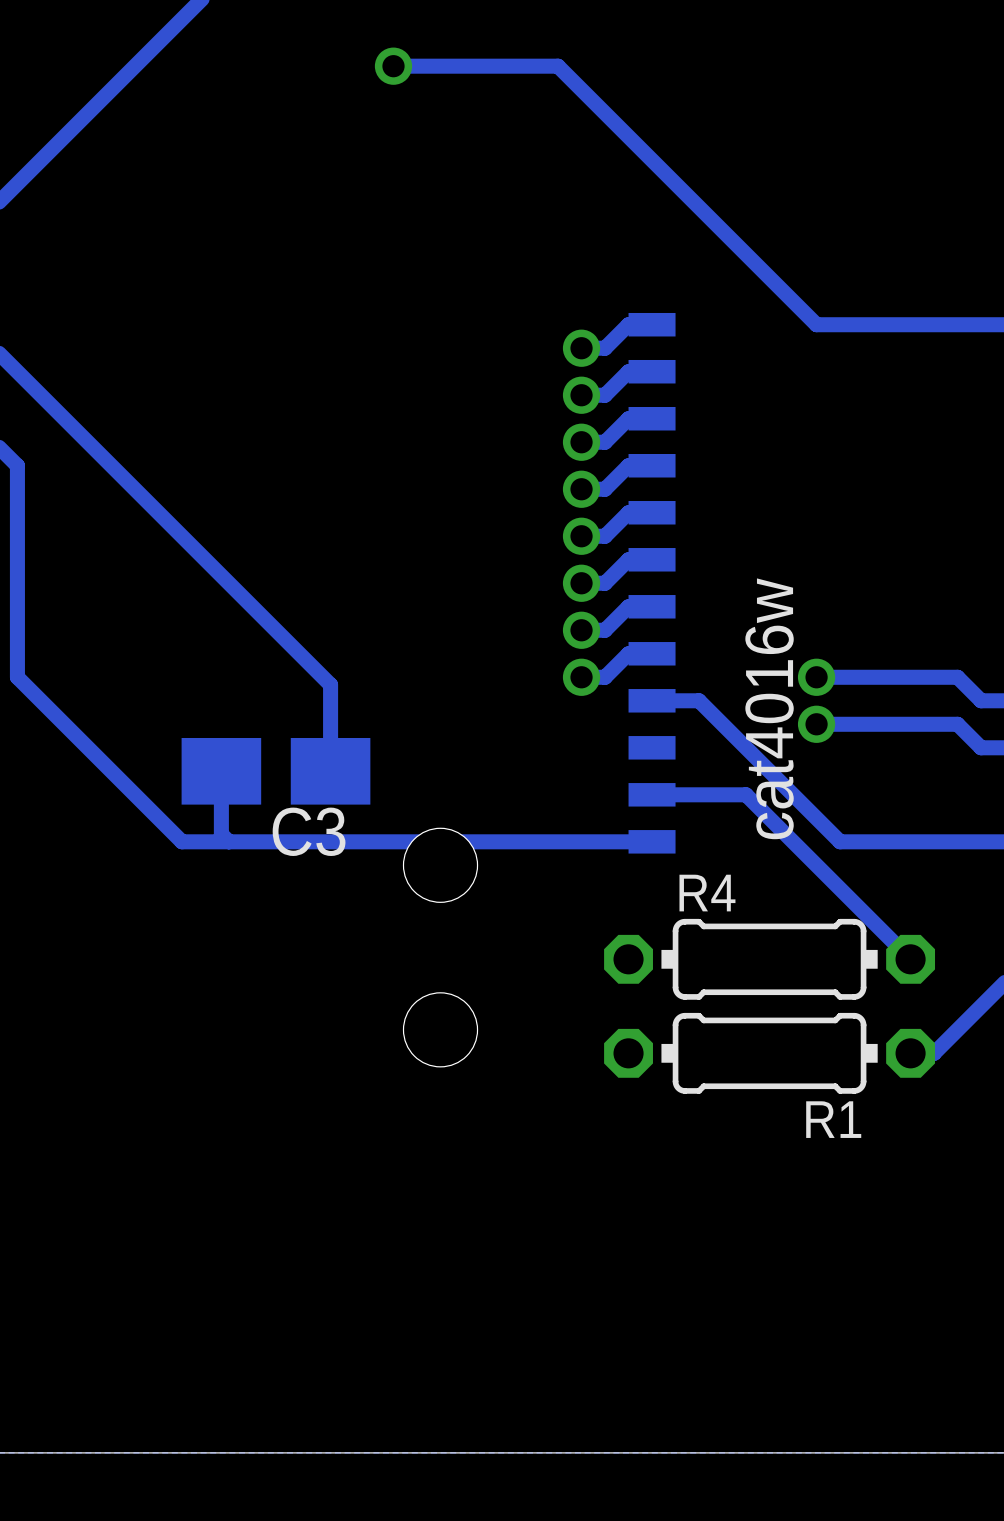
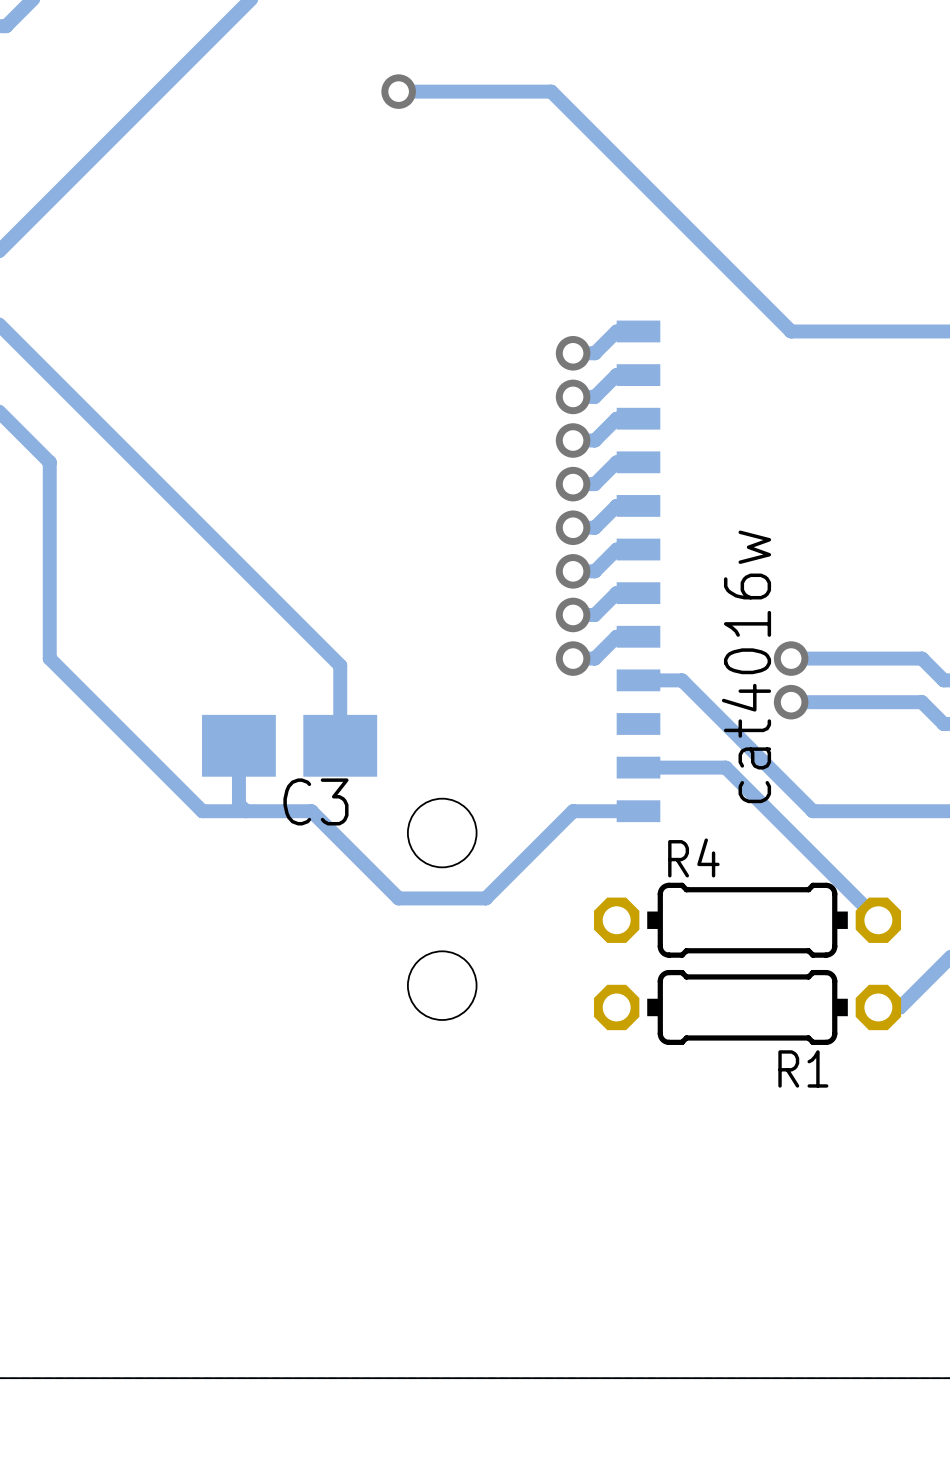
track: (581, 841) (299, 841) -> (573, 811) (485, 898) (398, 898) (311, 811)

